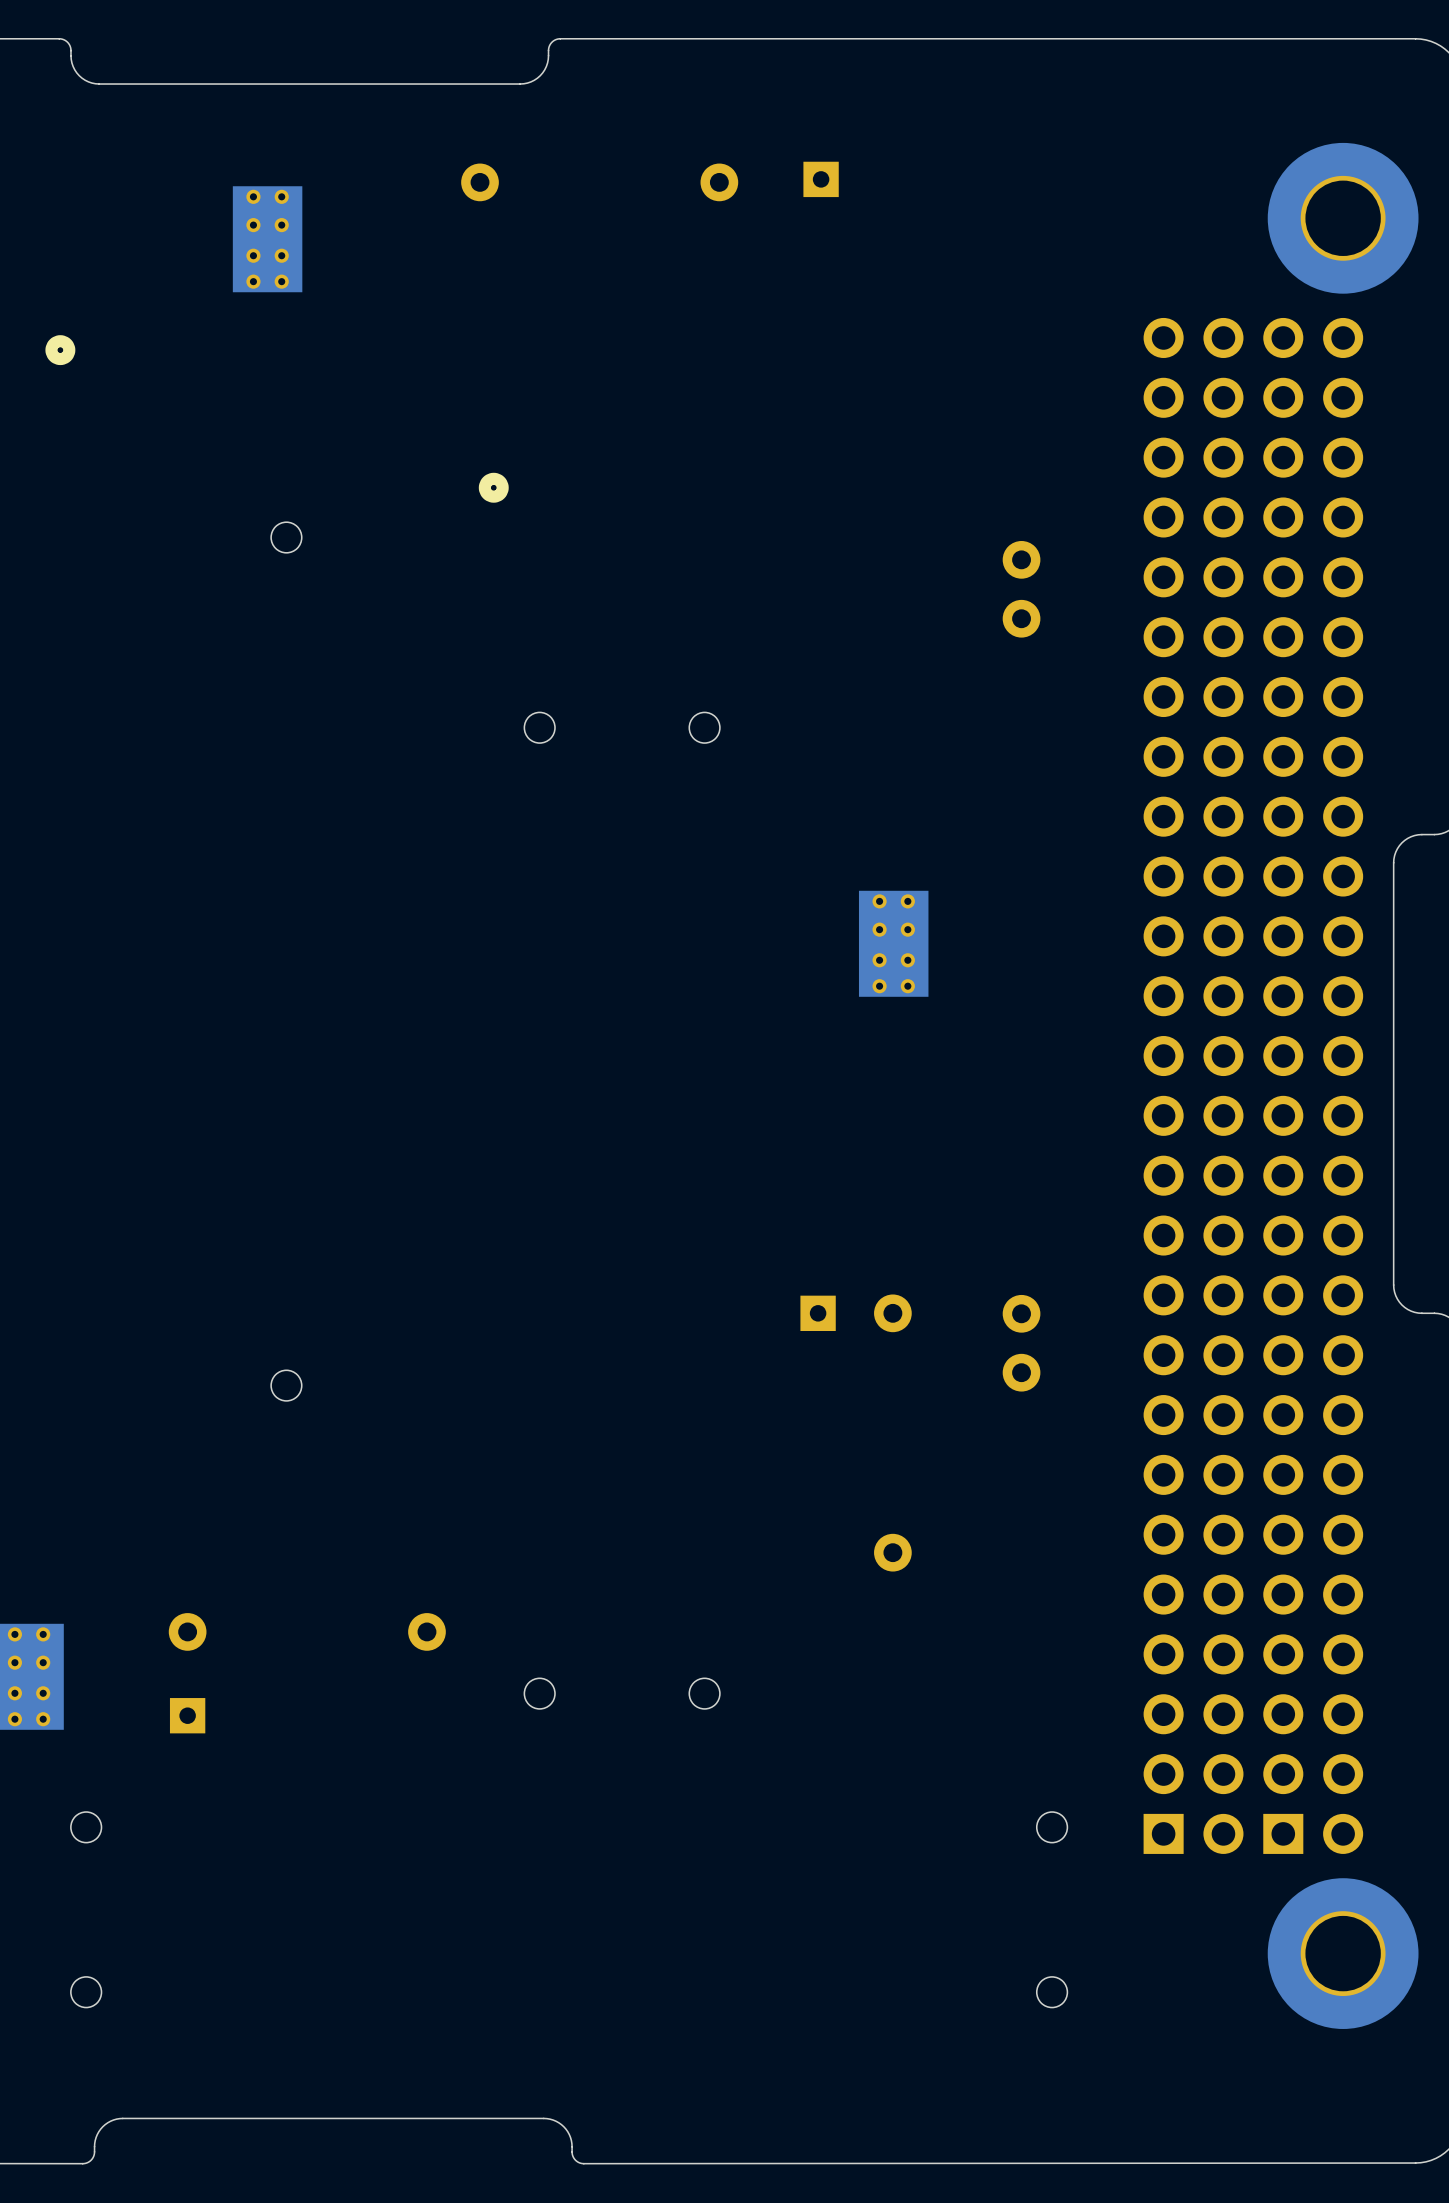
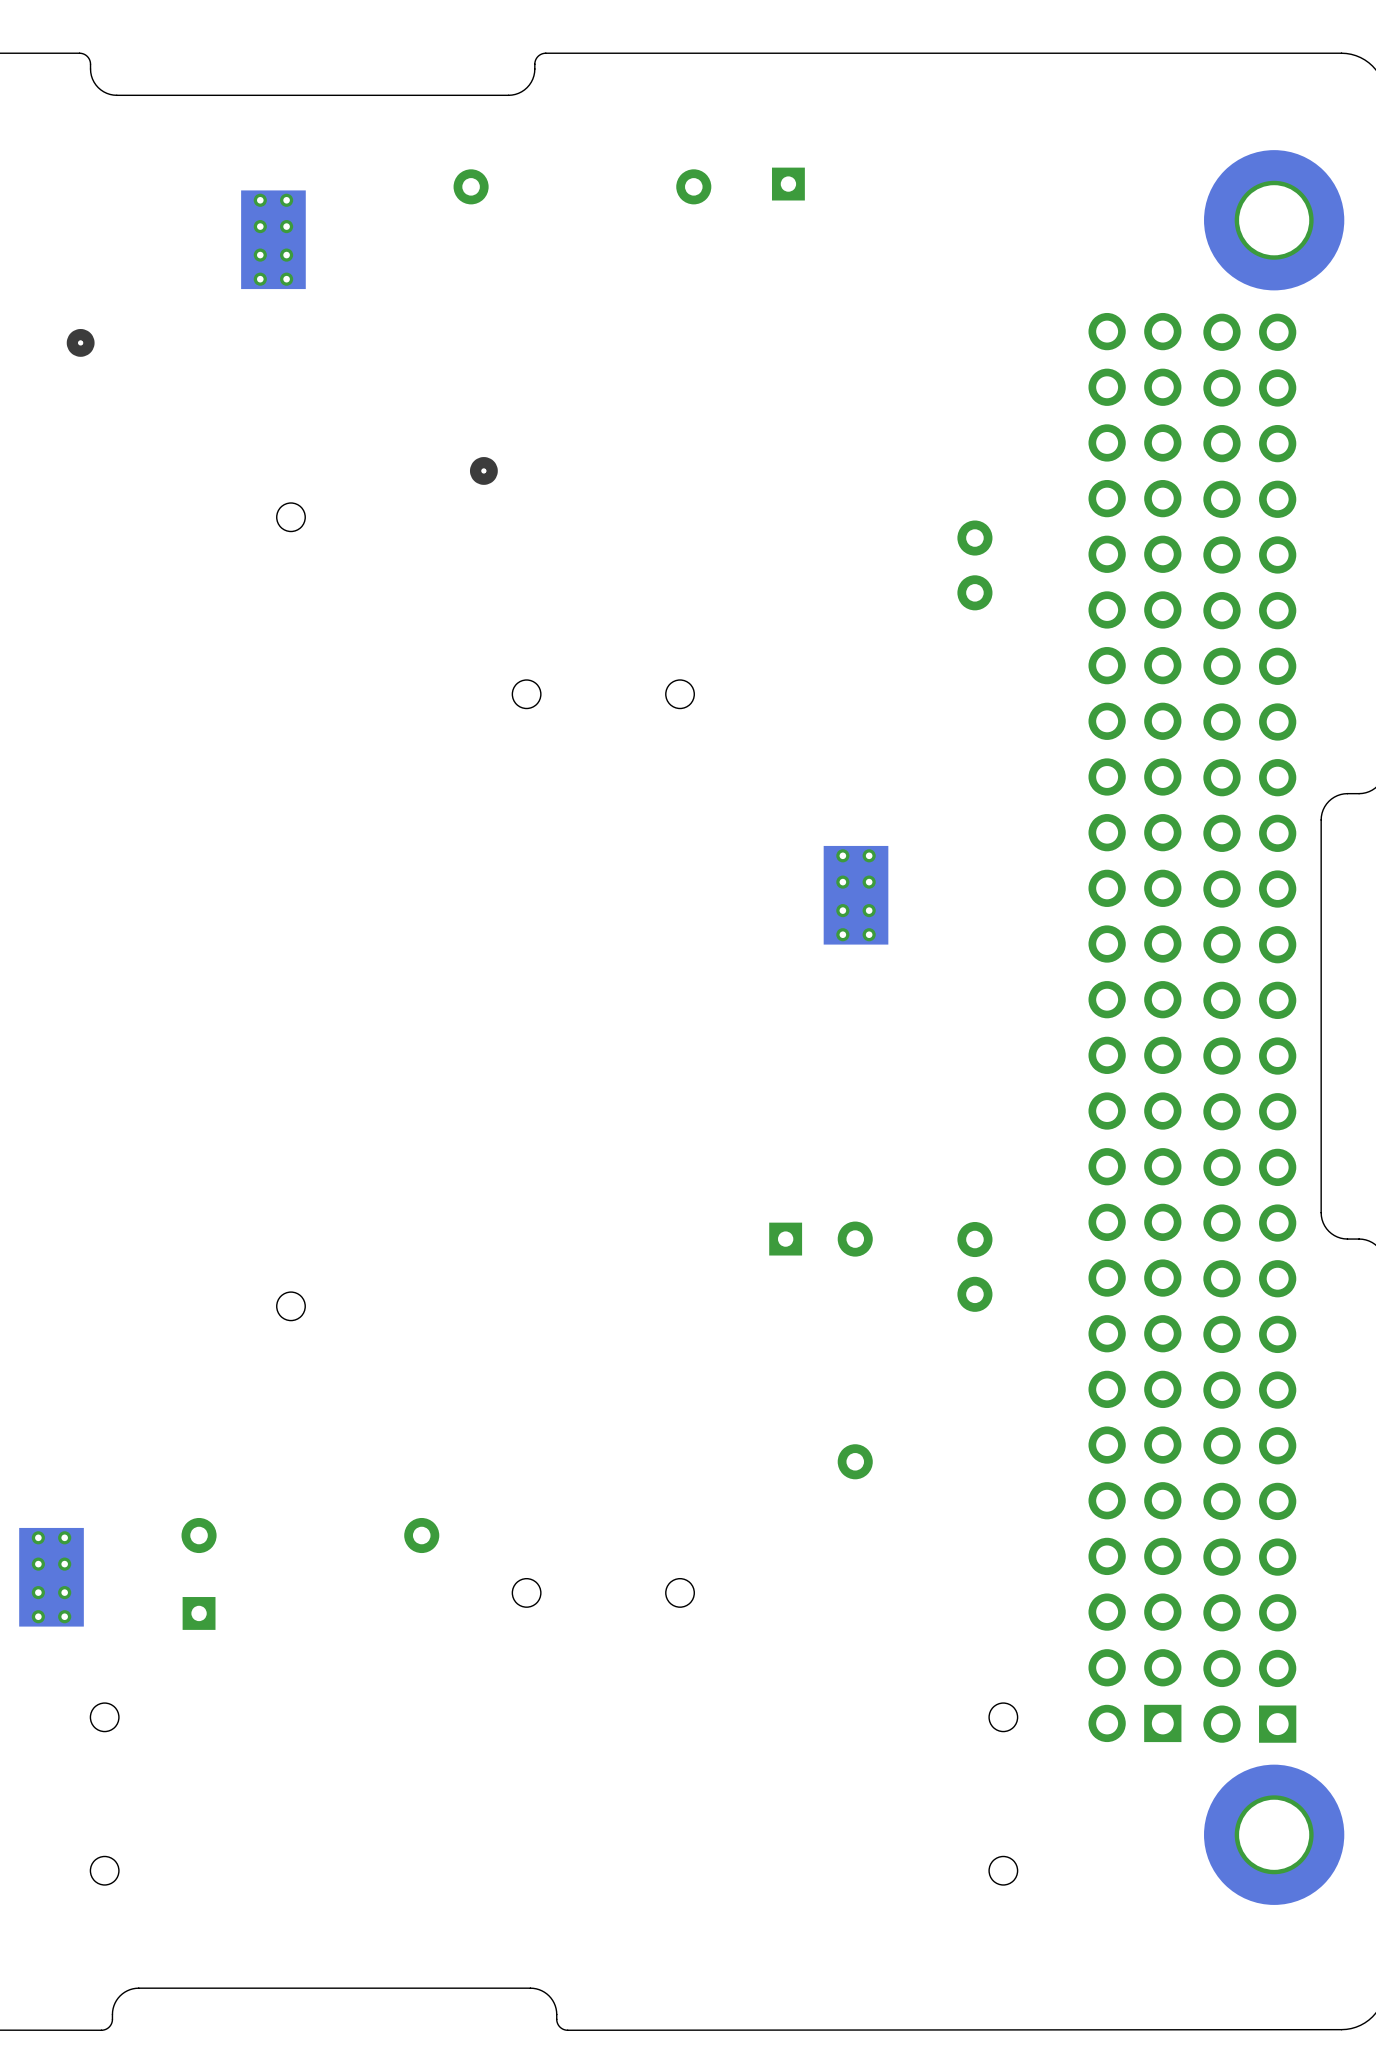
part footprint: [1143, 317, 1244, 1854] -> [1088, 312, 1182, 1743]
part footprint: [1263, 317, 1364, 1854] -> [1203, 313, 1297, 1743]

